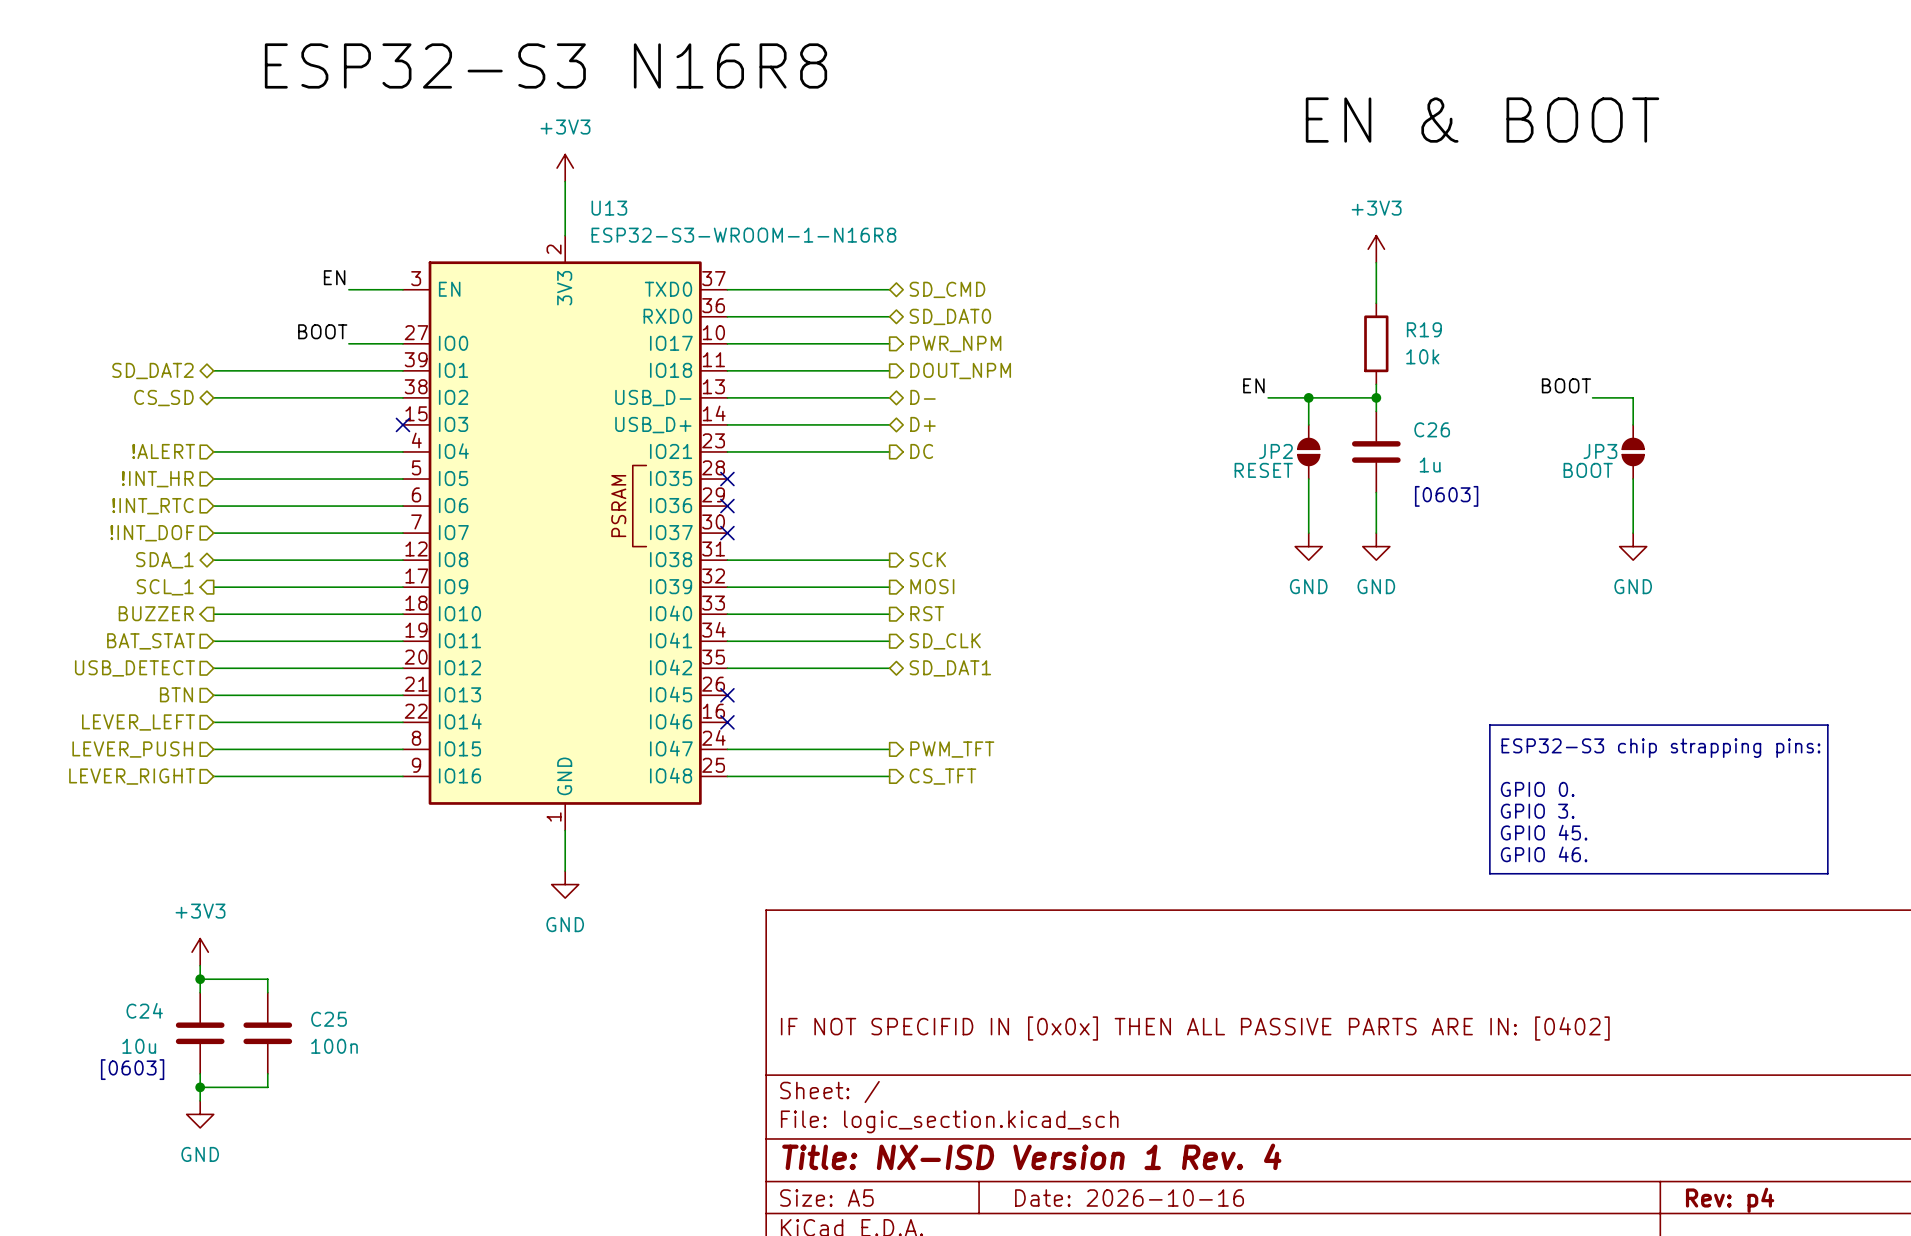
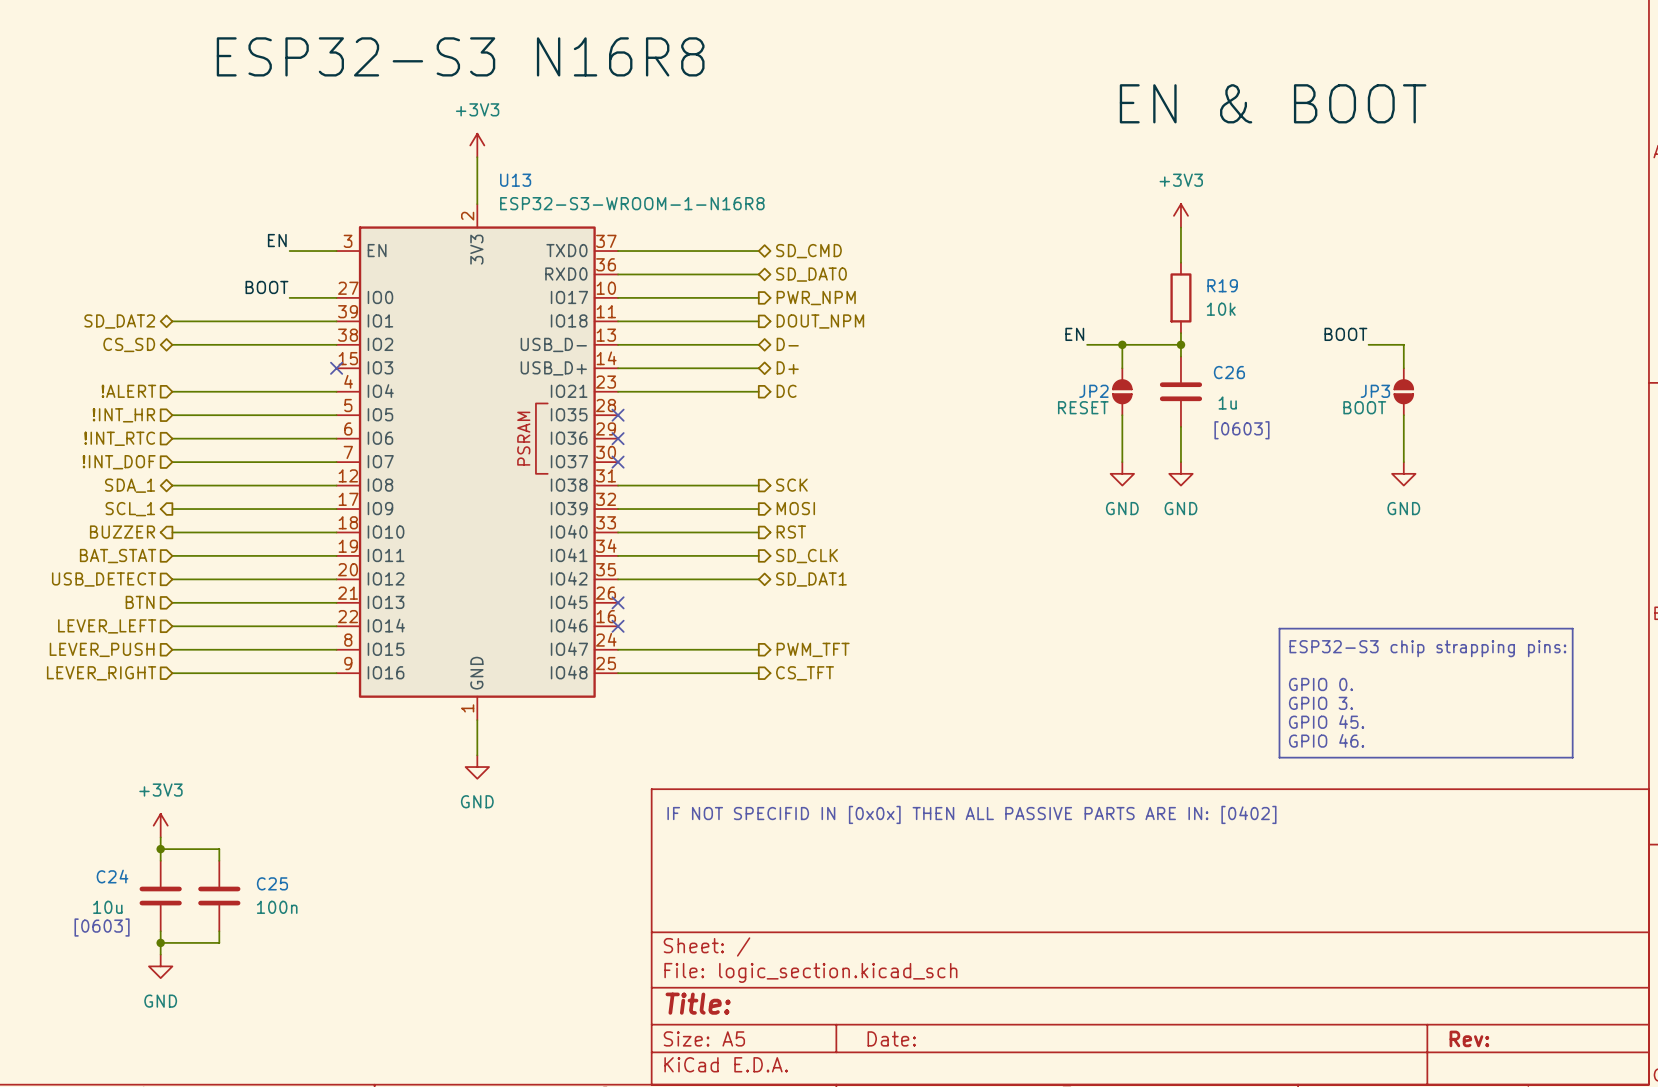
text: none -> IF NOT SPECIFID IN [0x0x] THEN ALL PASSIVE PARTS ARE IN: [0402] (971, 814)
title block: IF NOT SPECIFID IN [0x0x] THEN ALL PASSIVE PARTS ARE IN: [0402] (1195, 1028) -> none
title block: Title: NX-ISD Version 1 Rev. 4 (1031, 1156) -> Title: (698, 1003)
title block: Date: 2026-10-16 (1129, 1198) -> Date: (891, 1038)
title block: Rev: p4 (1730, 1200) -> Rev: (1469, 1038)

